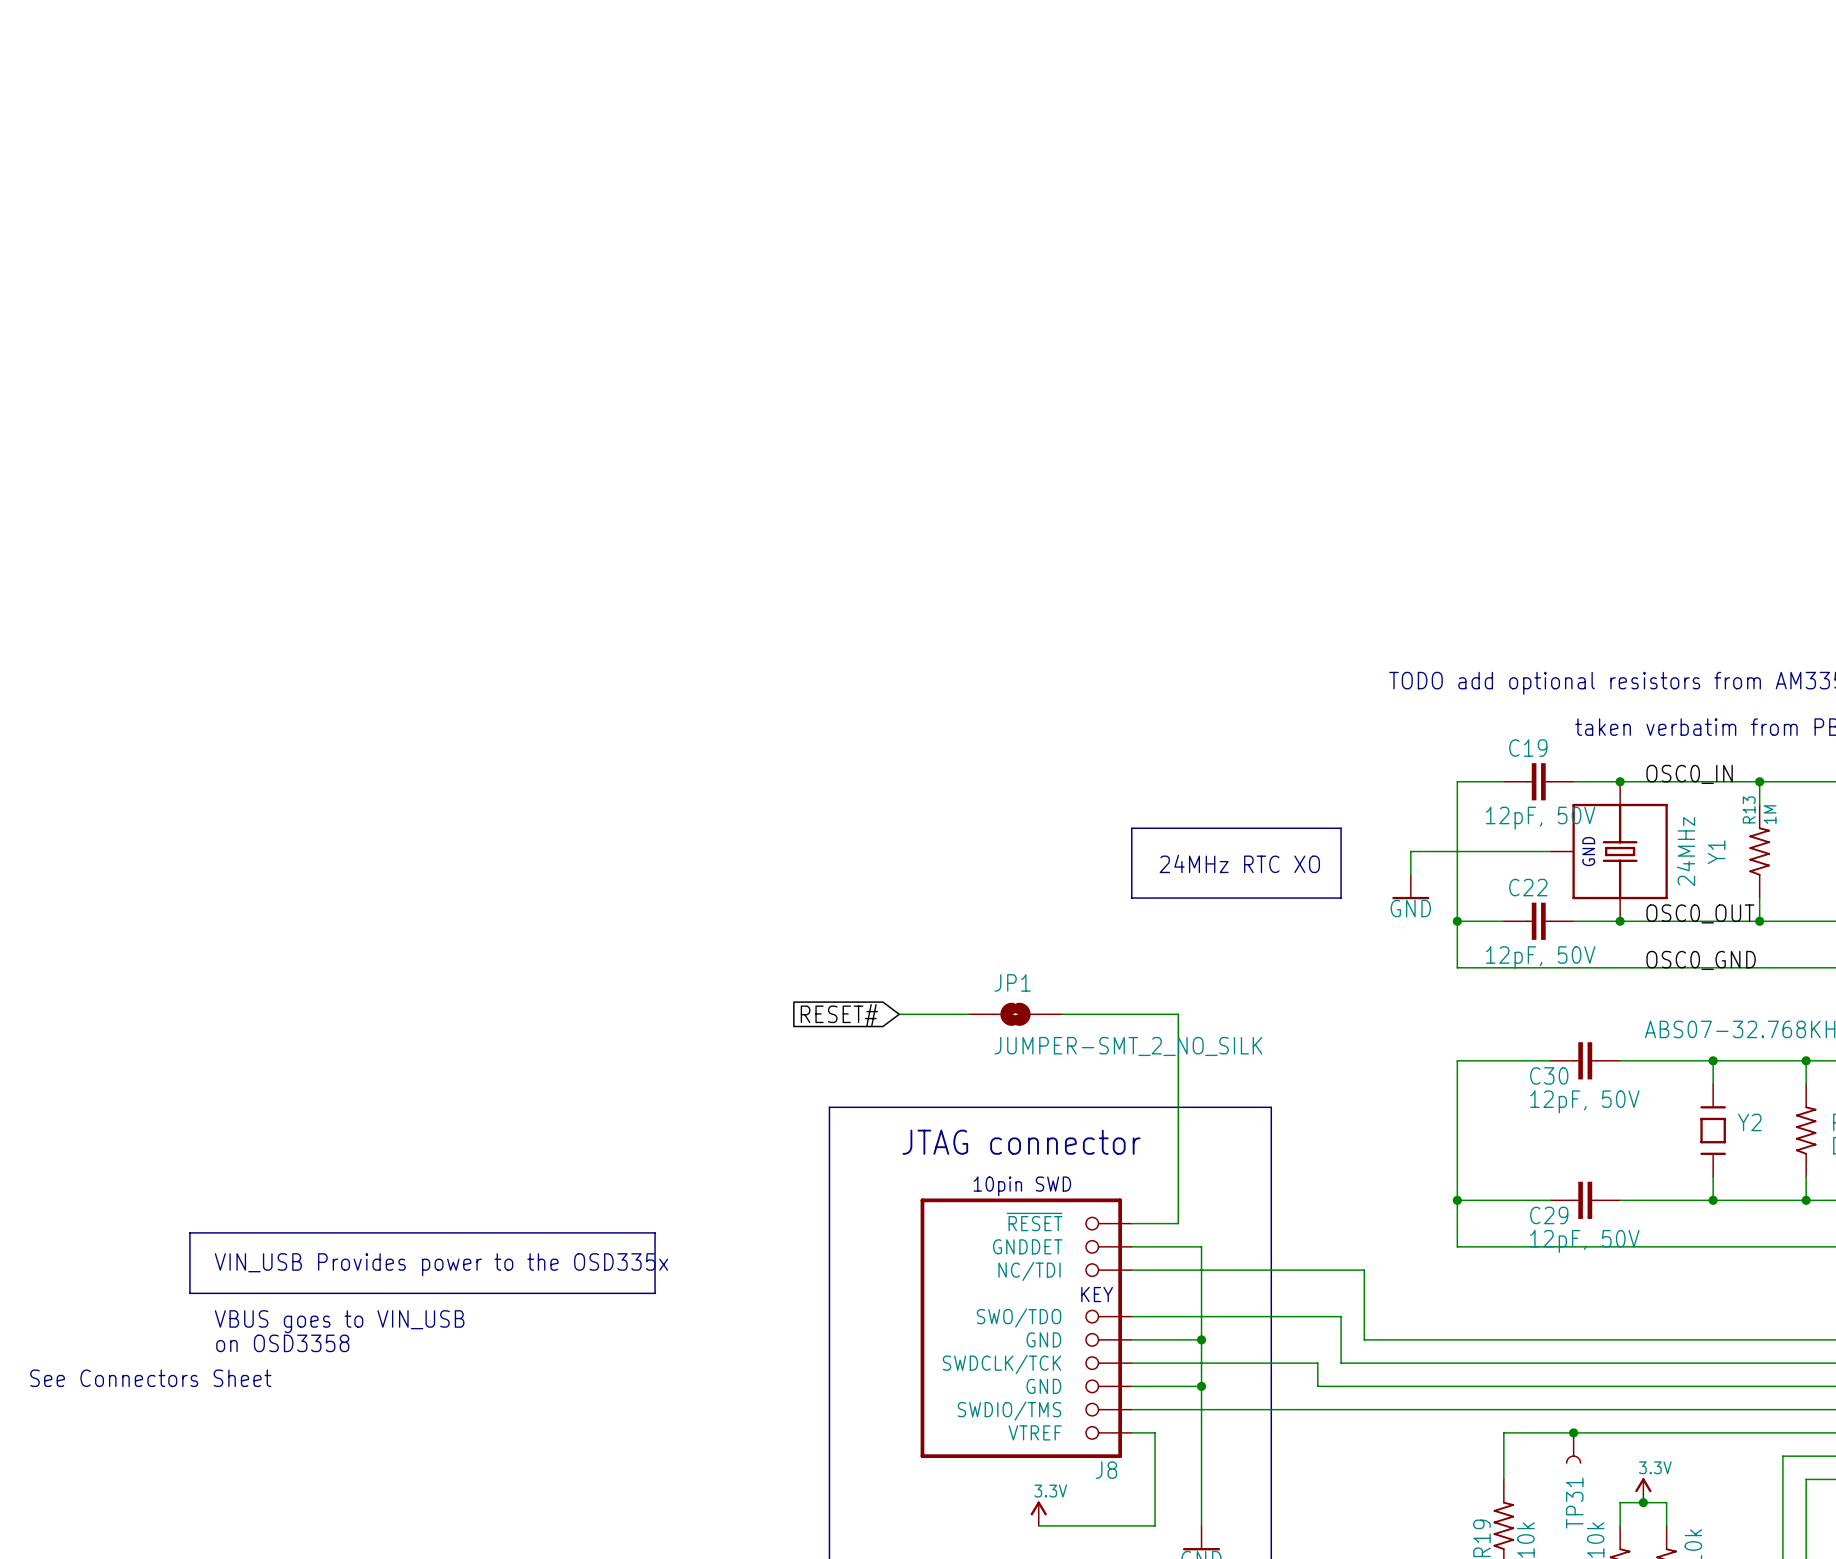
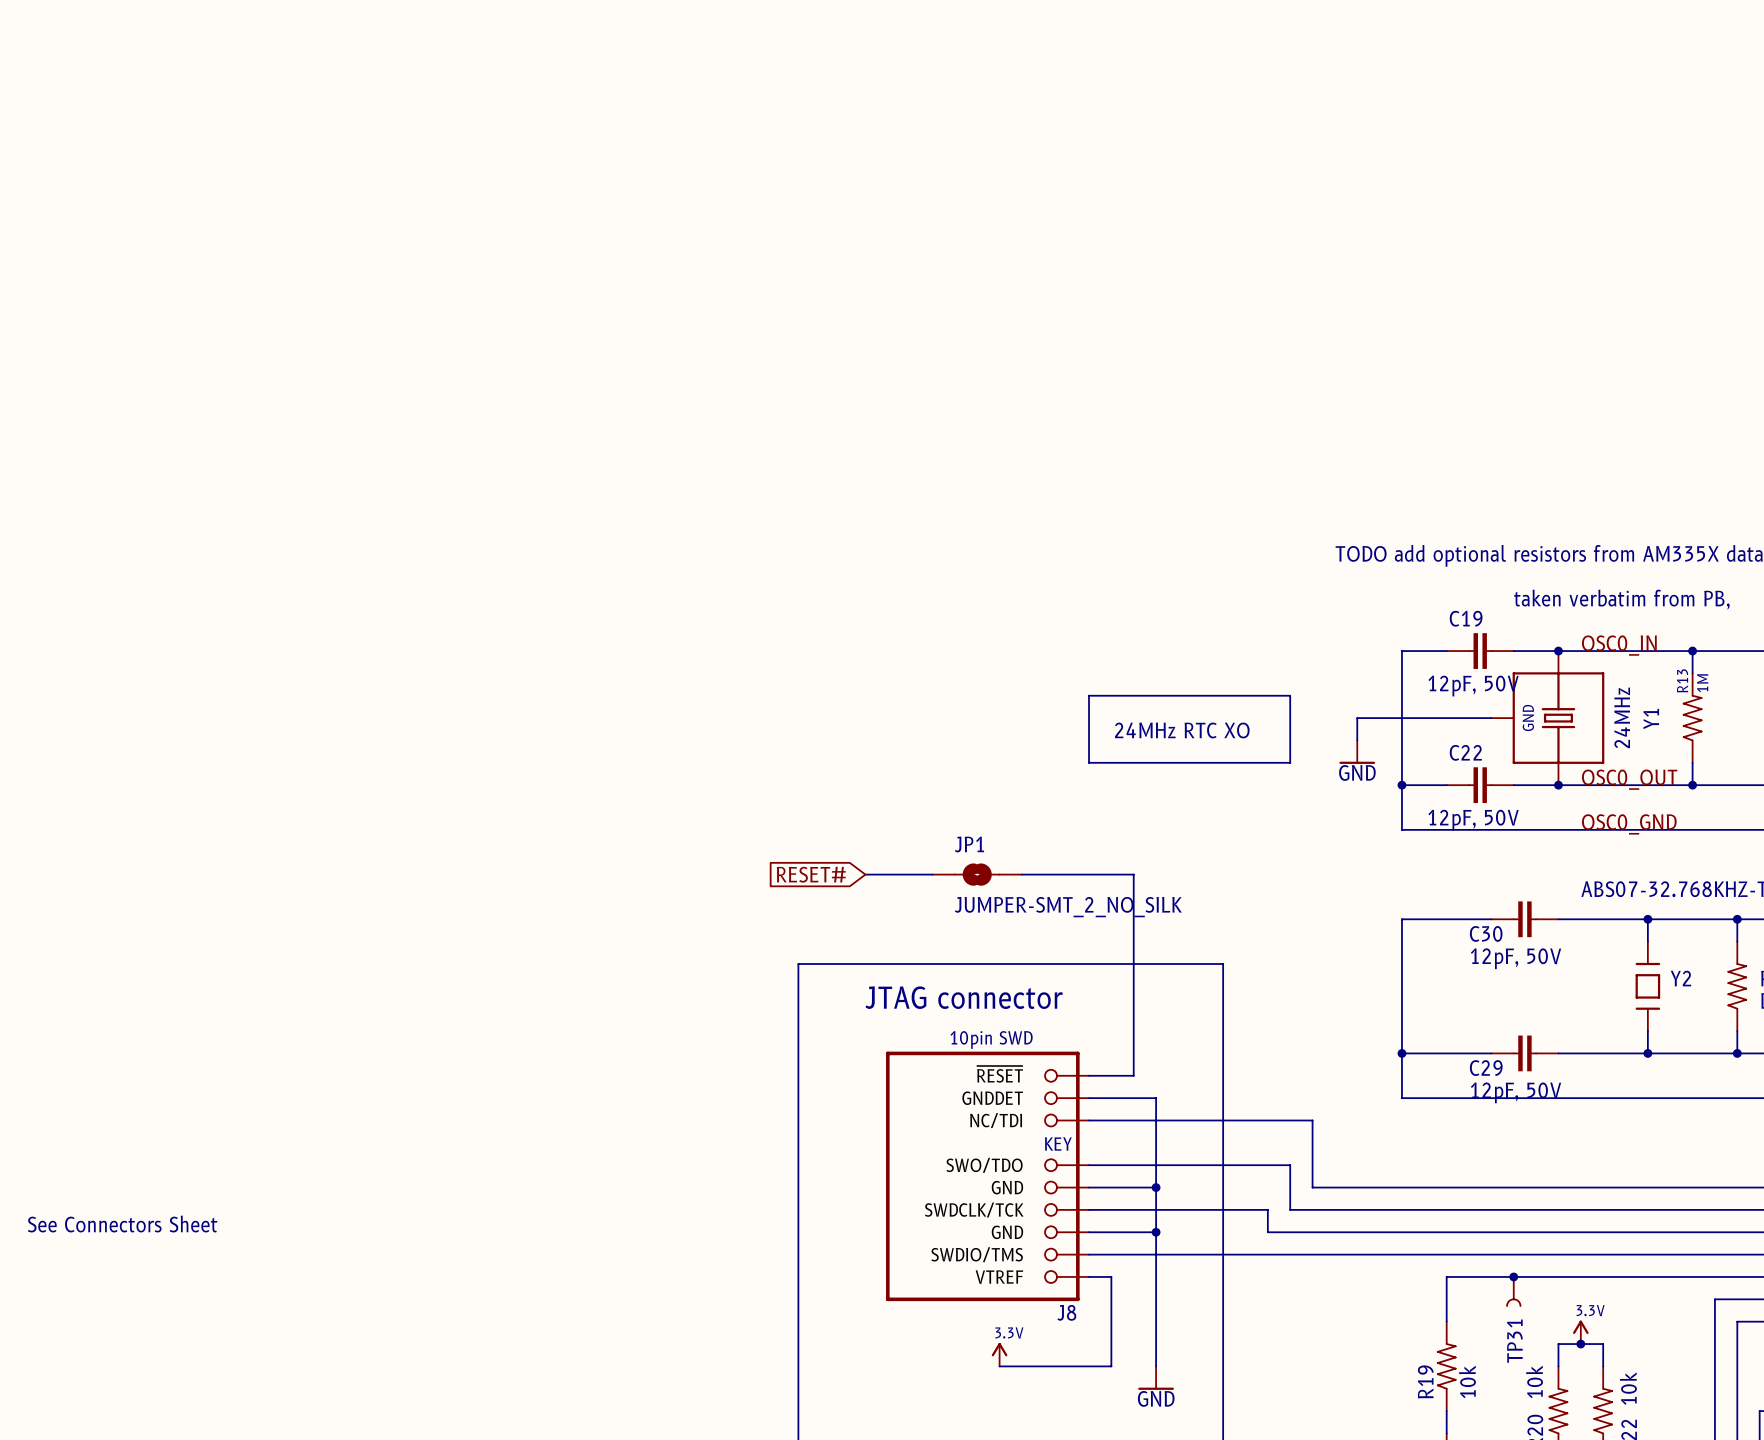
line: (189, 1232) (655, 1232) (655, 1293) (189, 1293) (189, 1232) -> none
text: VIN_USB Provides power to the OSD335x (441, 1264) -> none
text: VBUS goes to VIN_USB (339, 1321) -> none
text: on OSD3358 (282, 1343) -> none

